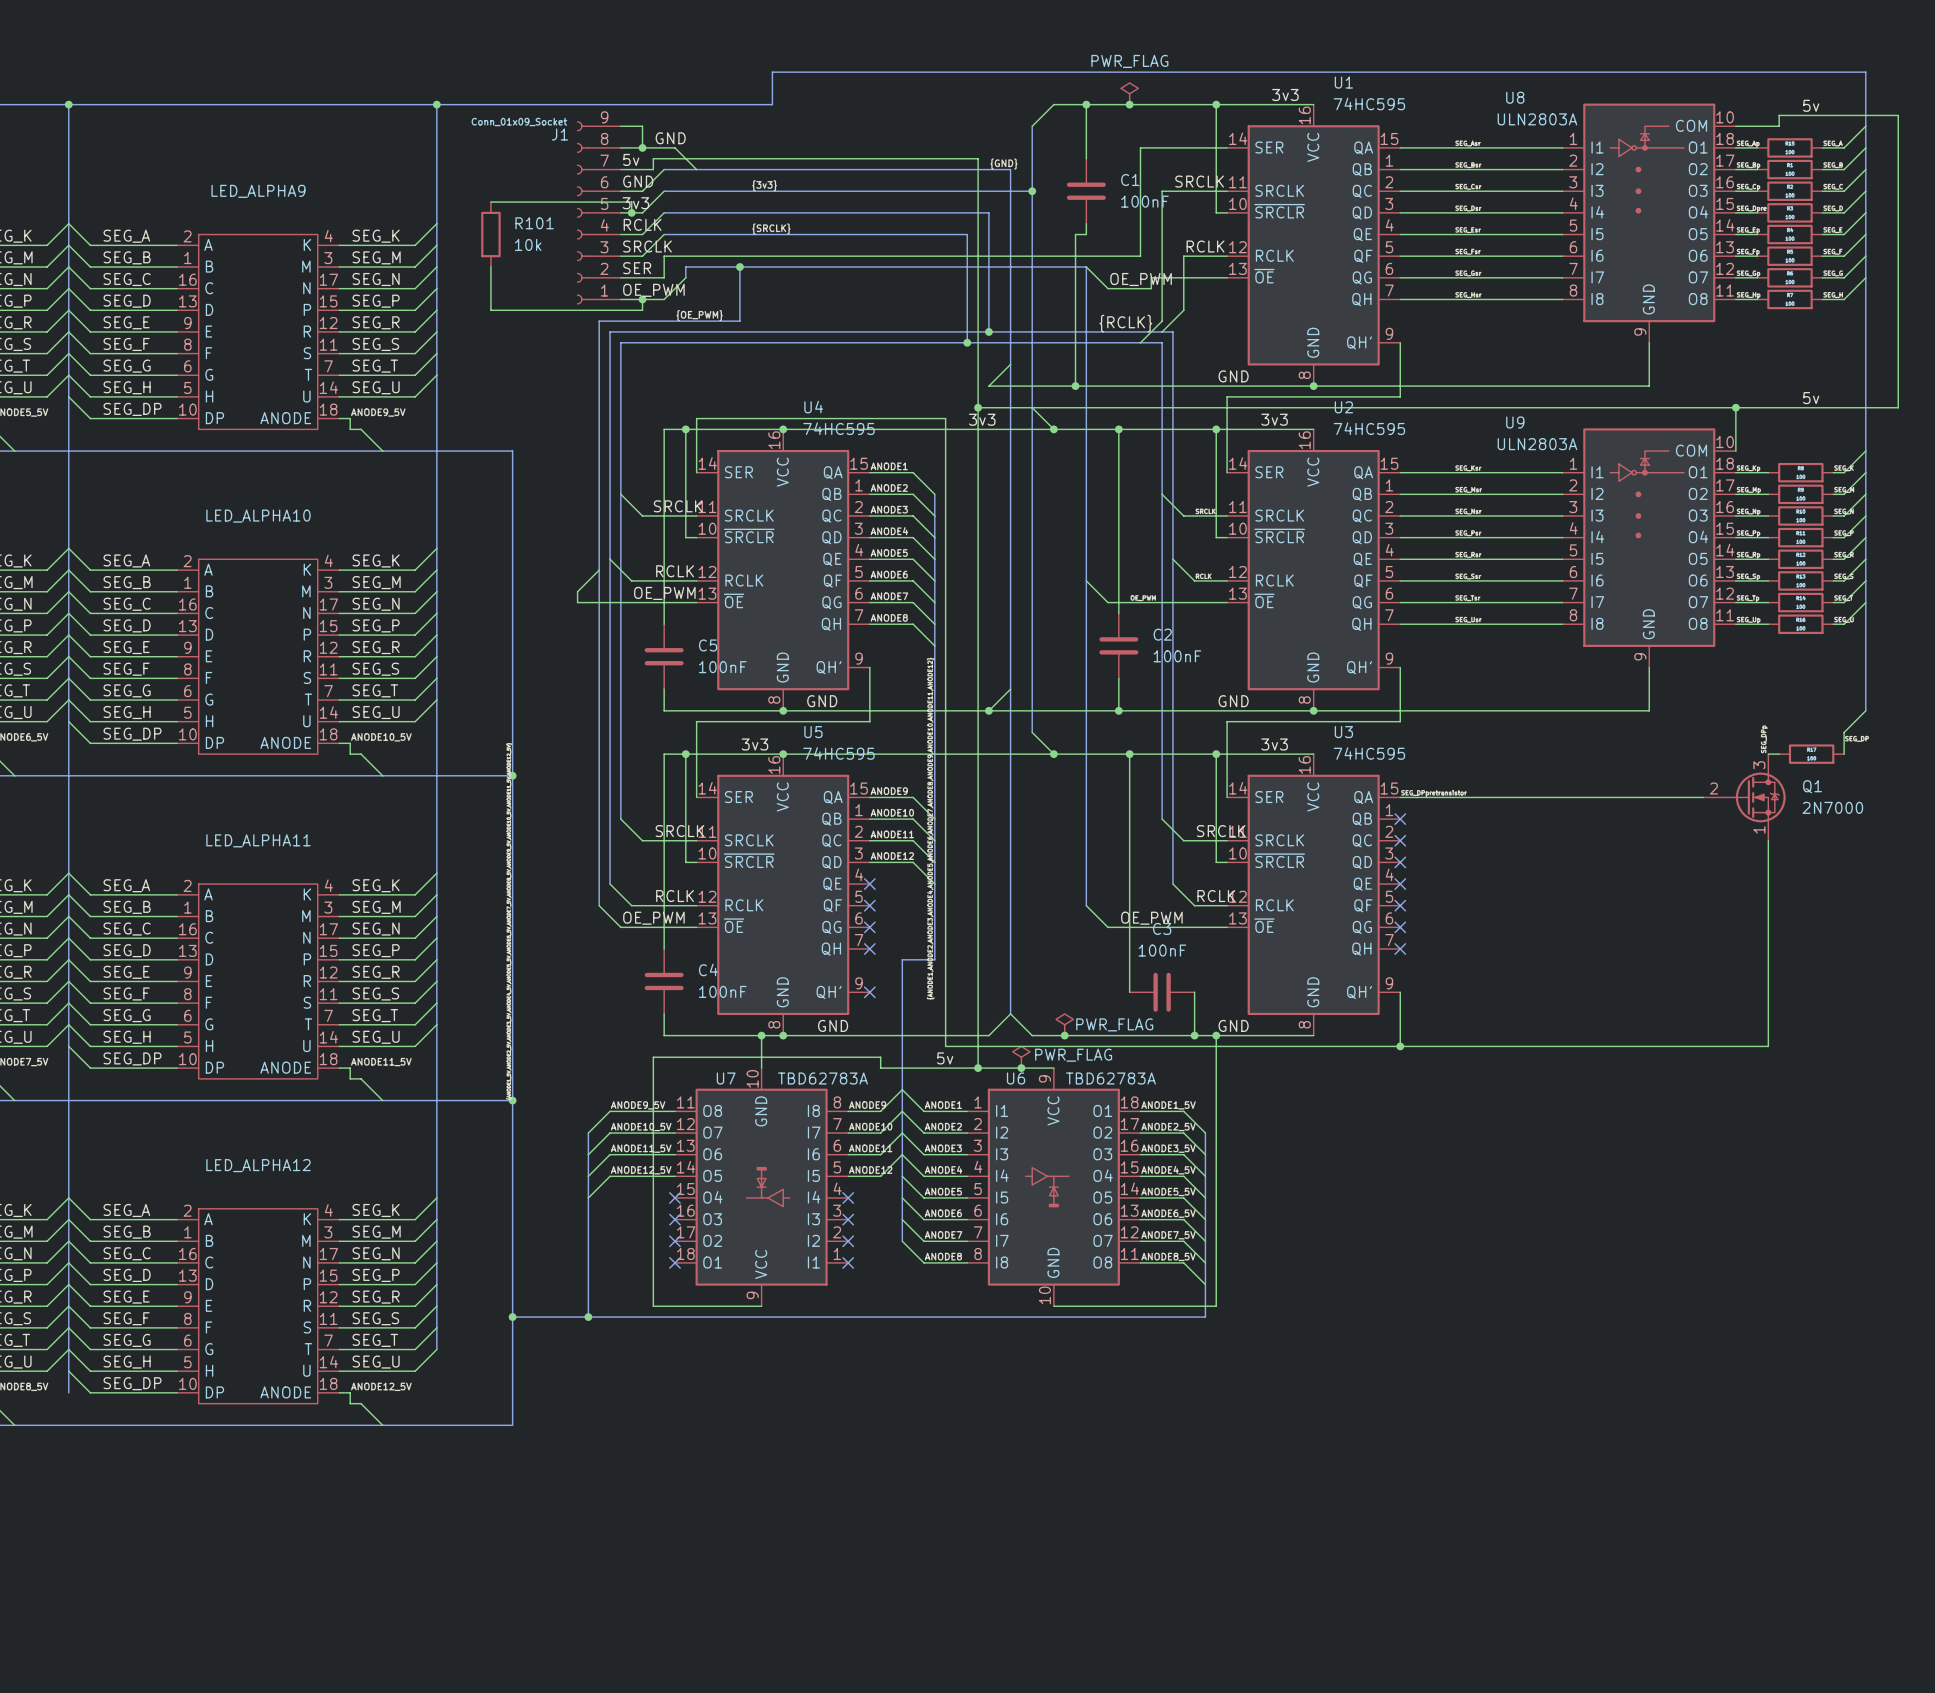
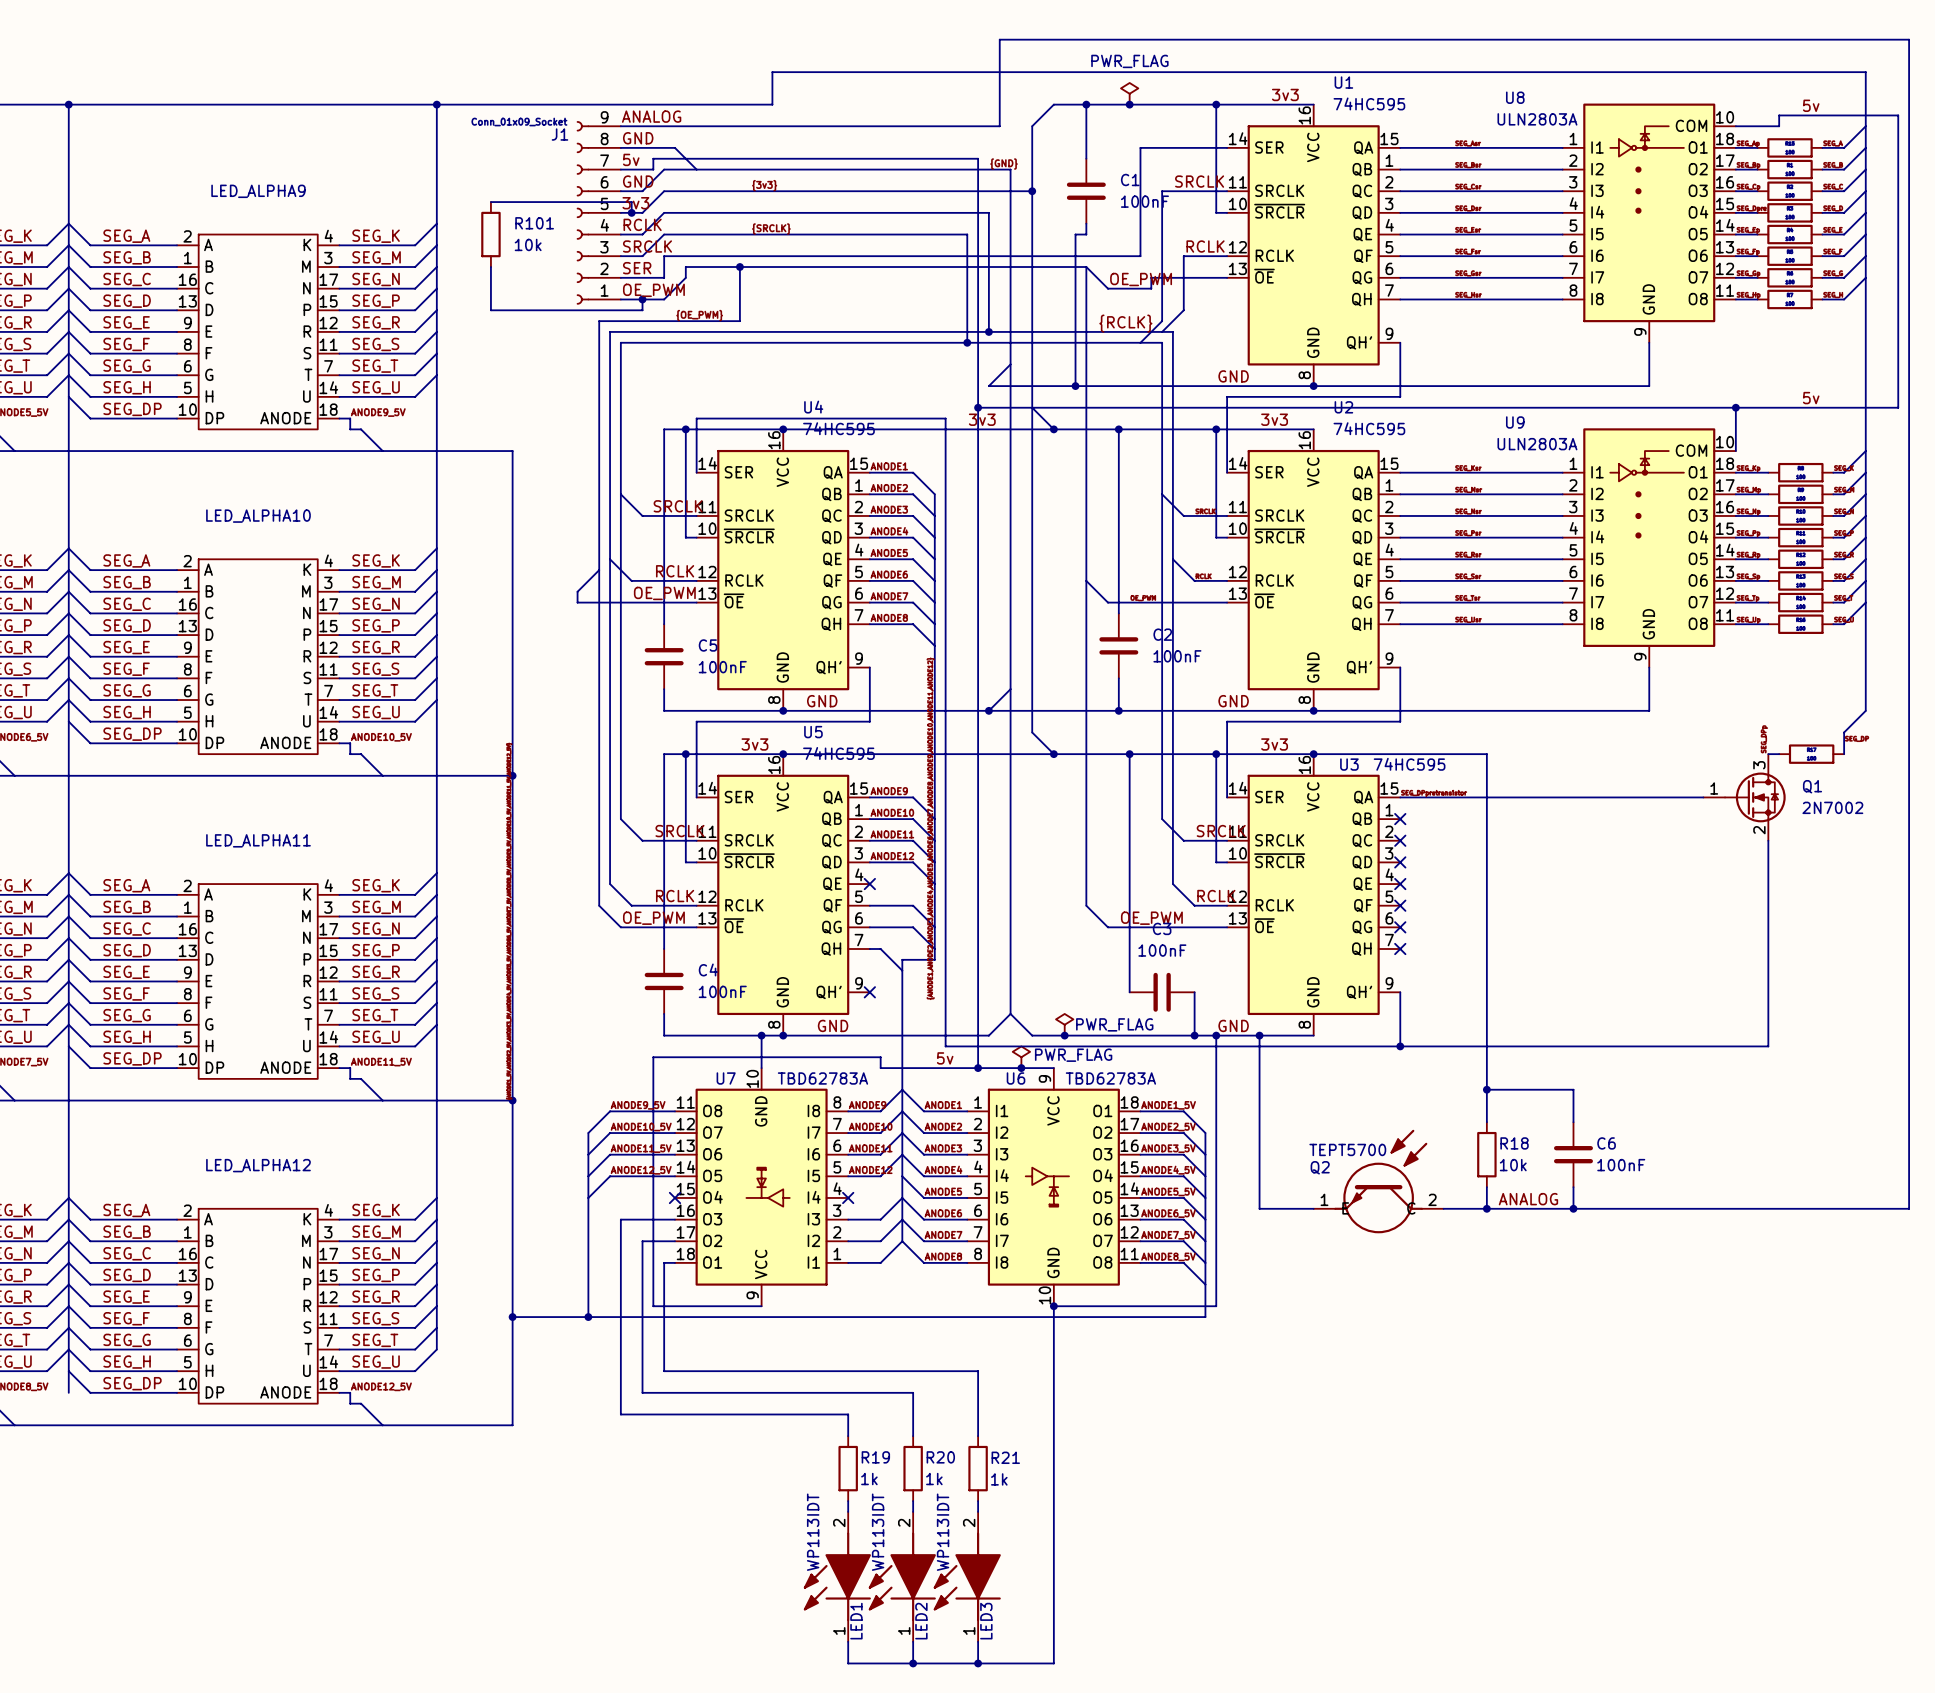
label: none -> ANALOG (651, 116)
wire: (642, 126) (642, 147) -> (642, 126) (999, 126) (999, 39) (1909, 39) (1909, 1208) (1443, 1208)
label position: GND (670, 138) -> GND (638, 138)
junction: (642, 147) -> none
U3 name position: U3 (1343, 732) -> U3 (1349, 764)
U3 value position: 74HC595 (1369, 753) -> 74HC595 (1409, 764)
wire: none -> (1313, 754) (1486, 754) (1486, 1122)
junction: none -> (1313, 754)
Q1 symbol: [1703, 754, 1786, 841] -> [1703, 754, 1786, 841]
Q1 value: 2N7000 (1832, 807) -> 2N7002 (1832, 807)
wire: none -> (869, 905) (913, 905) (934, 927)
no-connect mark: (869, 905) -> none
wire: none -> (869, 927) (913, 927) (934, 949)
no-connect mark: (869, 927) -> none
wire: none -> (869, 949) (880, 949) (902, 970)
no-connect mark: (869, 949) -> none
wire: none -> (1259, 1035) (1259, 1208) (1313, 1208)
junction: none -> (1259, 1035)
wire: none -> (1486, 1089) (1573, 1089) (1573, 1122)
junction: none -> (1486, 1089)
R18: none -> 10k (1486, 1154)
C6: none -> 100nF (1573, 1154)
Q2: none -> TEPT5700 (1378, 1181)
wire: none -> (1486, 1187) (1486, 1208)
wire: none -> (1573, 1187) (1573, 1208)
wire: none -> (902, 1197) (880, 1219) (848, 1219)
label: none -> ANALOG (1528, 1199)
junction: none -> (1486, 1208)
junction: none -> (1573, 1208)
wire: none -> (674, 1219) (620, 1219) (620, 1414) (848, 1414) (848, 1436)
no-connect mark: (674, 1219) -> none
no-connect mark: (848, 1219) -> none
wire: none -> (902, 1219) (880, 1241) (848, 1241)
wire: none -> (674, 1241) (642, 1241) (642, 1392) (913, 1392) (913, 1436)
no-connect mark: (674, 1241) -> none
no-connect mark: (848, 1241) -> none
wire: none -> (902, 1241) (880, 1262) (848, 1262)
wire: none -> (674, 1262) (664, 1262) (664, 1371) (978, 1371) (978, 1436)
no-connect mark: (674, 1262) -> none
no-connect mark: (848, 1262) -> none
wire: none -> (1053, 1306) (1053, 1663) (848, 1663) (848, 1641)
junction: none -> (1053, 1306)
R19: none -> 1k (848, 1468)
R20: none -> 1k (913, 1468)
R21: none -> 1k (978, 1468)
wire: none -> (848, 1501) (848, 1511)
wire: none -> (913, 1501) (913, 1511)
wire: none -> (978, 1501) (978, 1511)
LED1: none -> WP113IDT (837, 1576)
LED2: none -> WP113IDT (902, 1576)
LED3: none -> WP113IDT (967, 1576)
wire: none -> (913, 1641) (913, 1663)
wire: none -> (978, 1641) (978, 1663)
junction: none -> (913, 1663)
junction: none -> (978, 1663)

